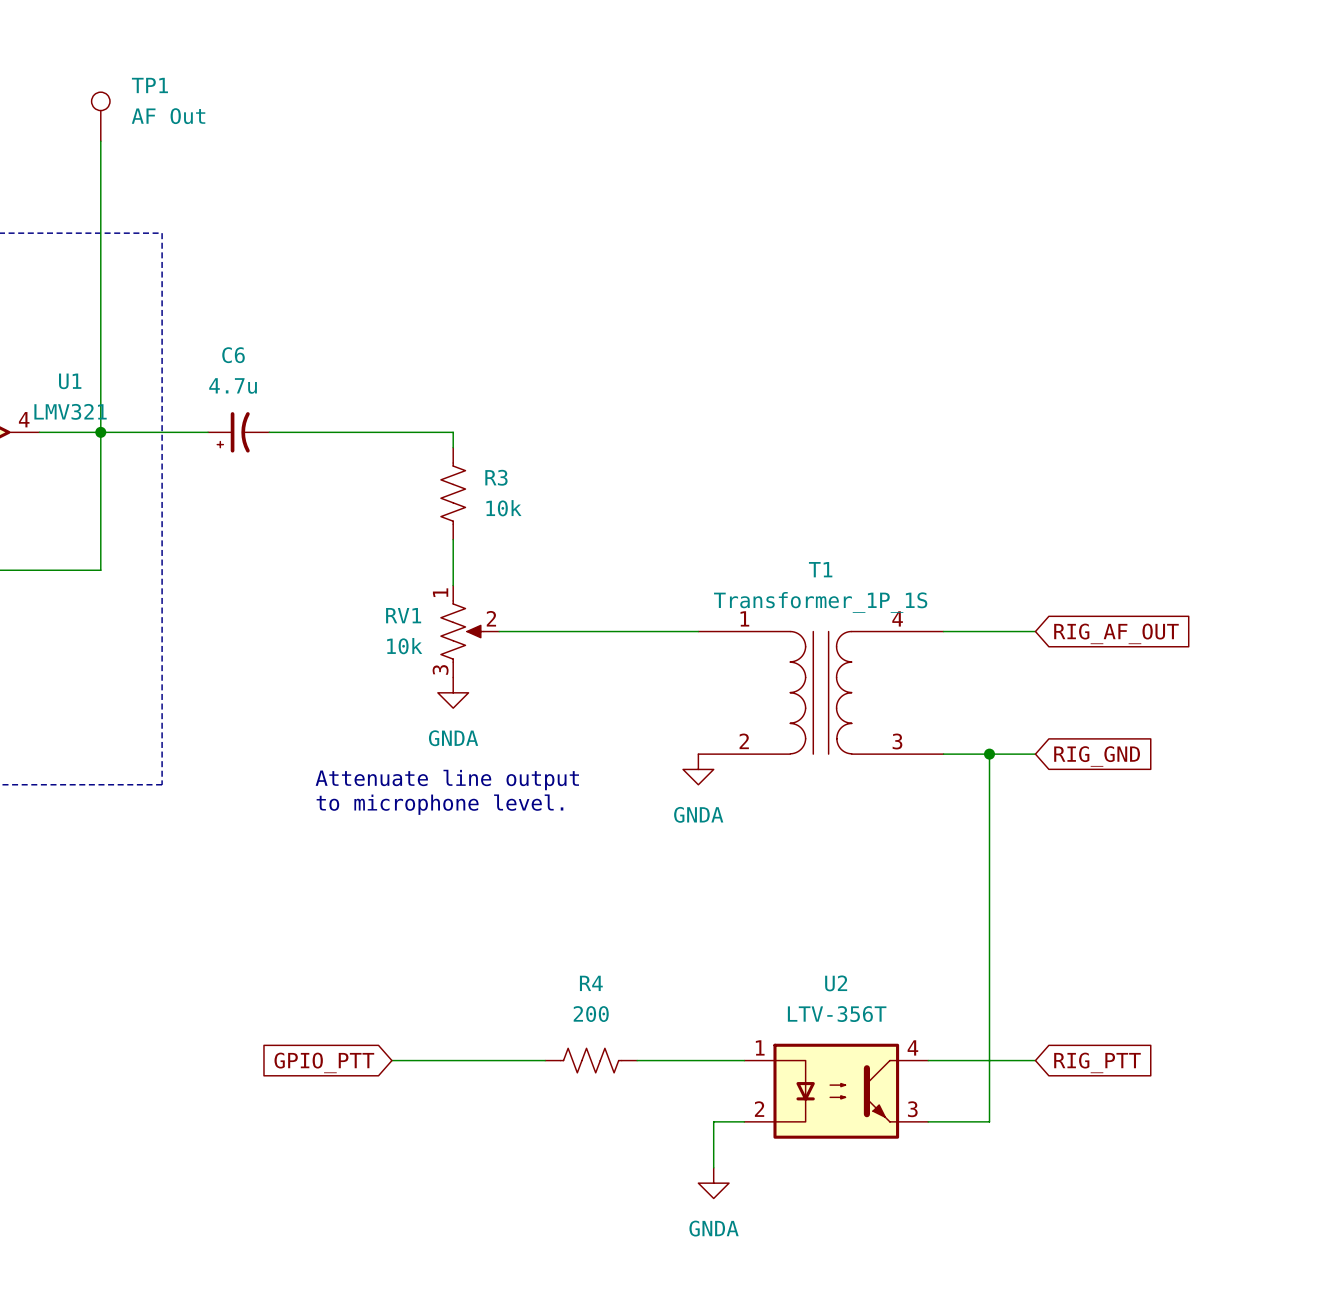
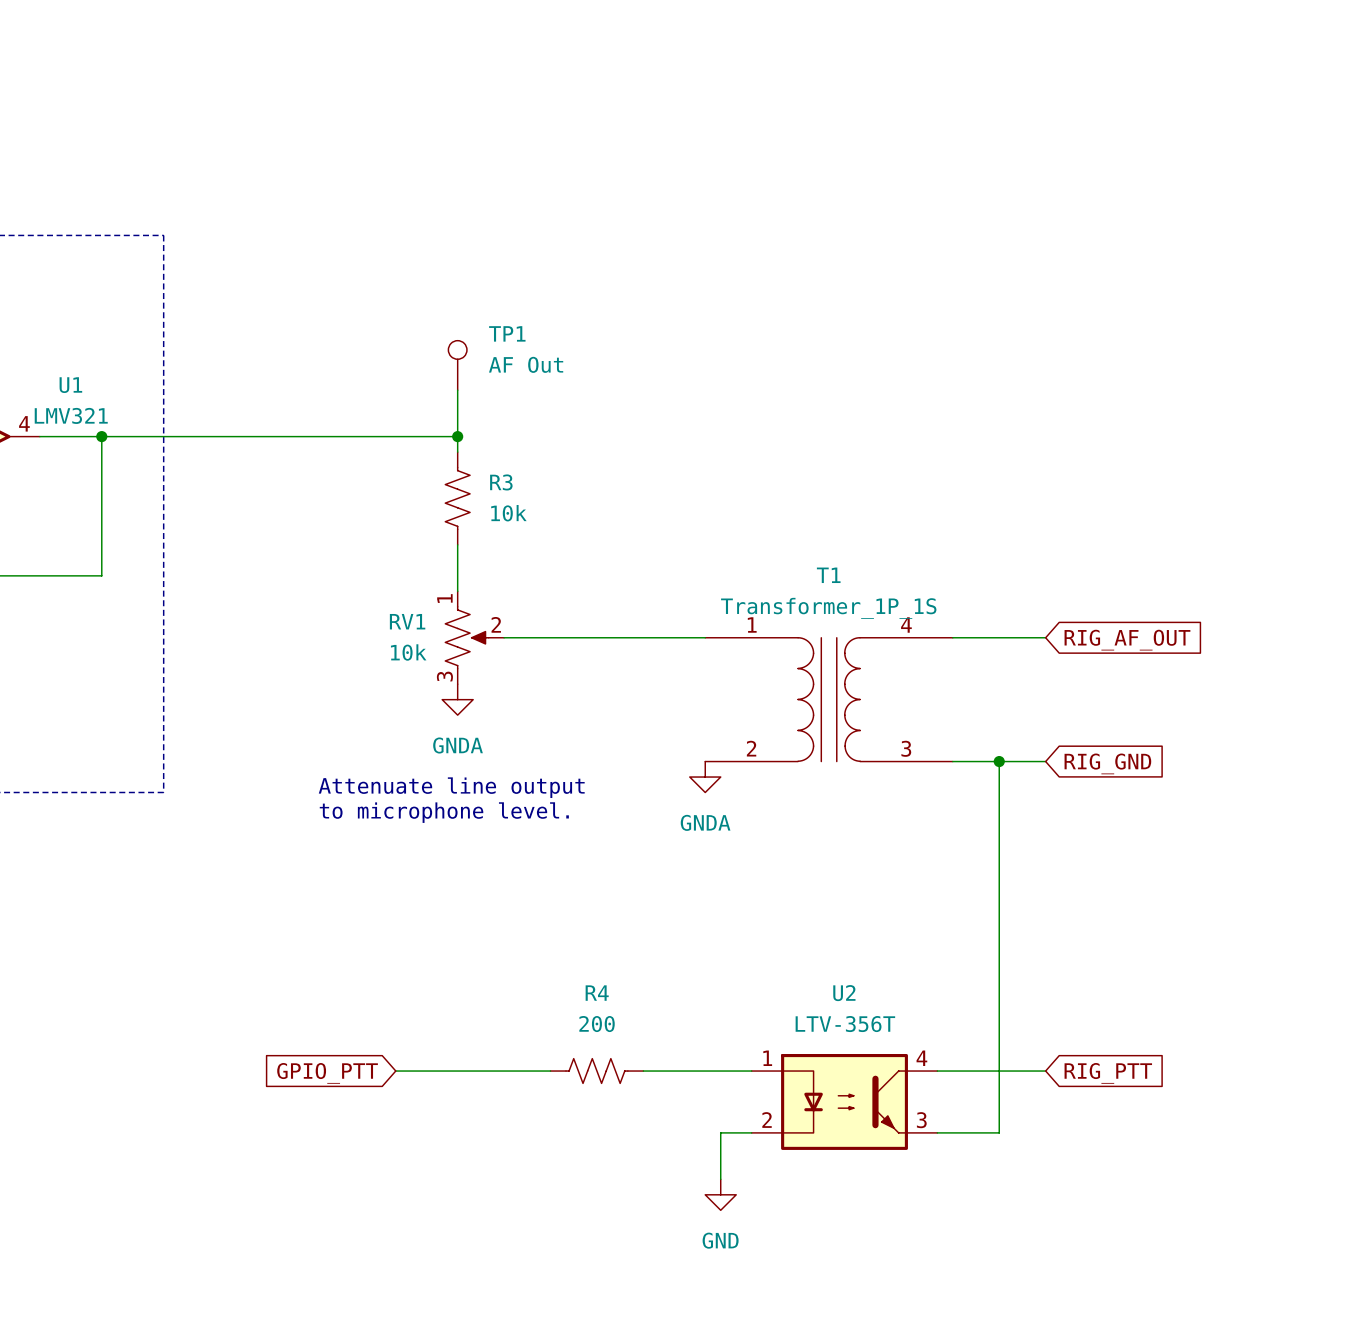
TP1 position: (100, 116) -> (457, 365)
wire: (100, 141) (100, 432) -> none
wire: none -> (457, 390) (457, 436)
C6: 4.7u (238, 432) -> none
junction: none -> (457, 436)
power symbol: GNDA (713, 1183) -> GND (720, 1194)

